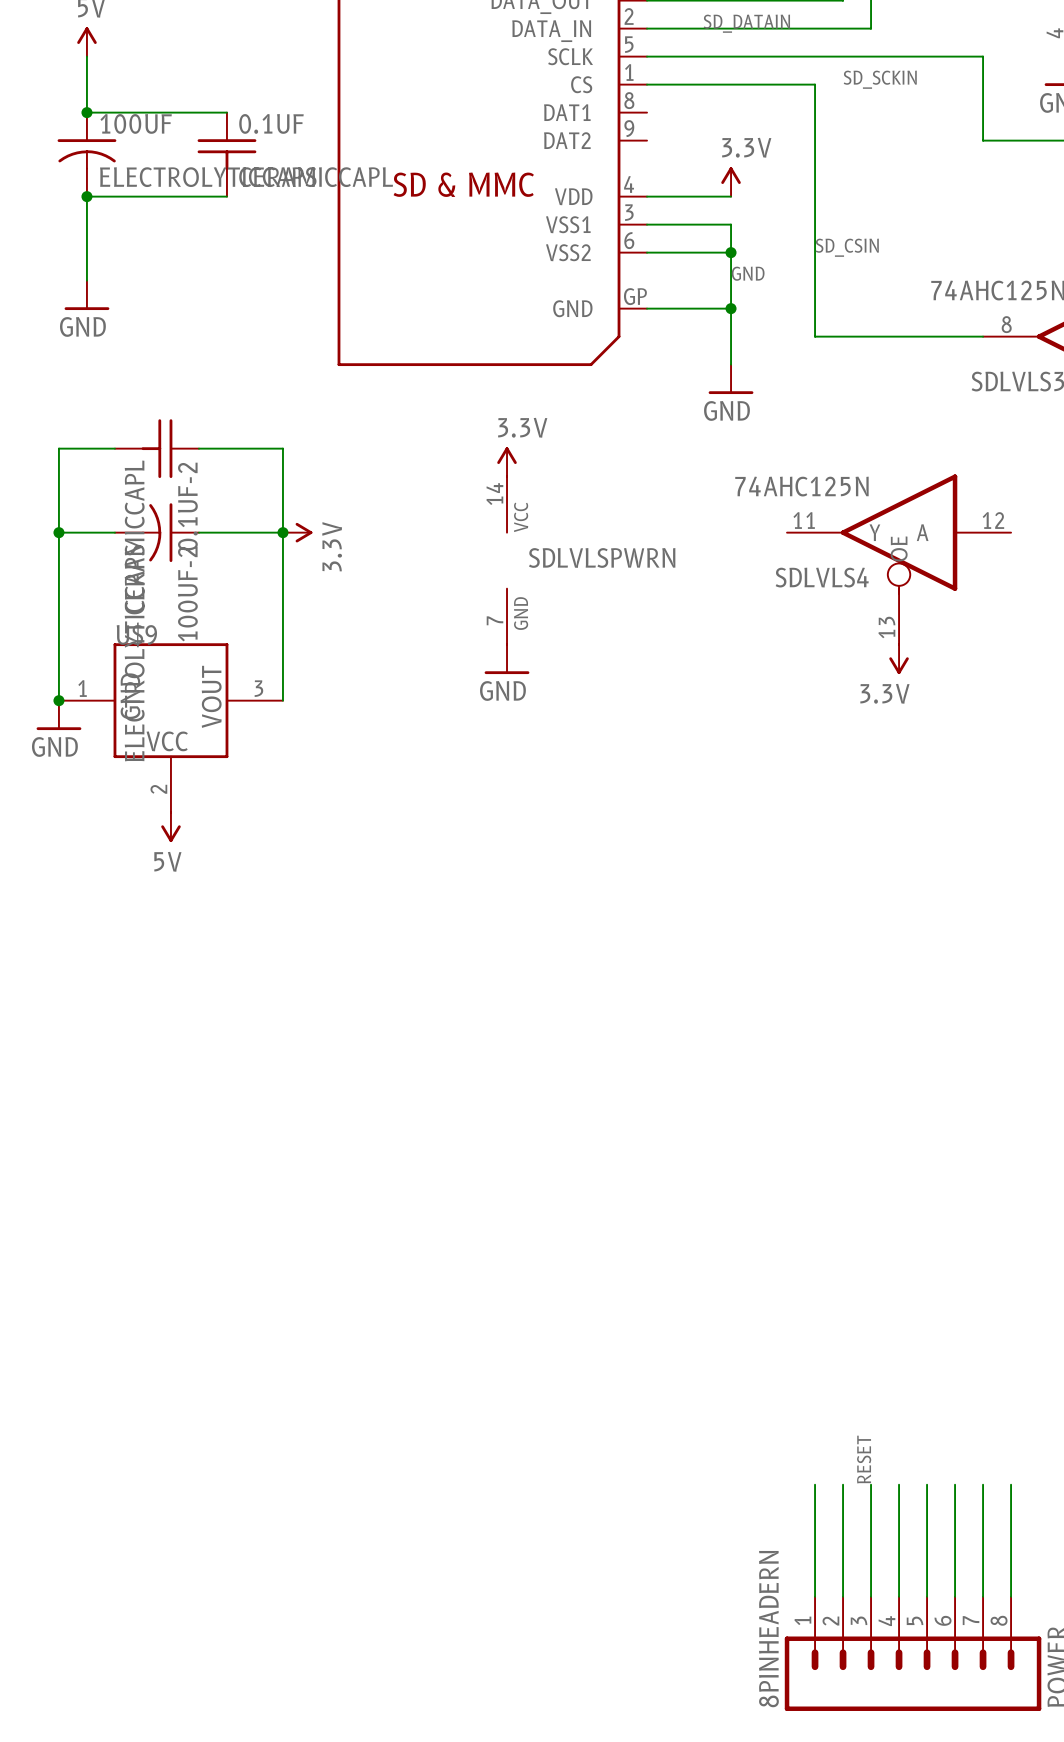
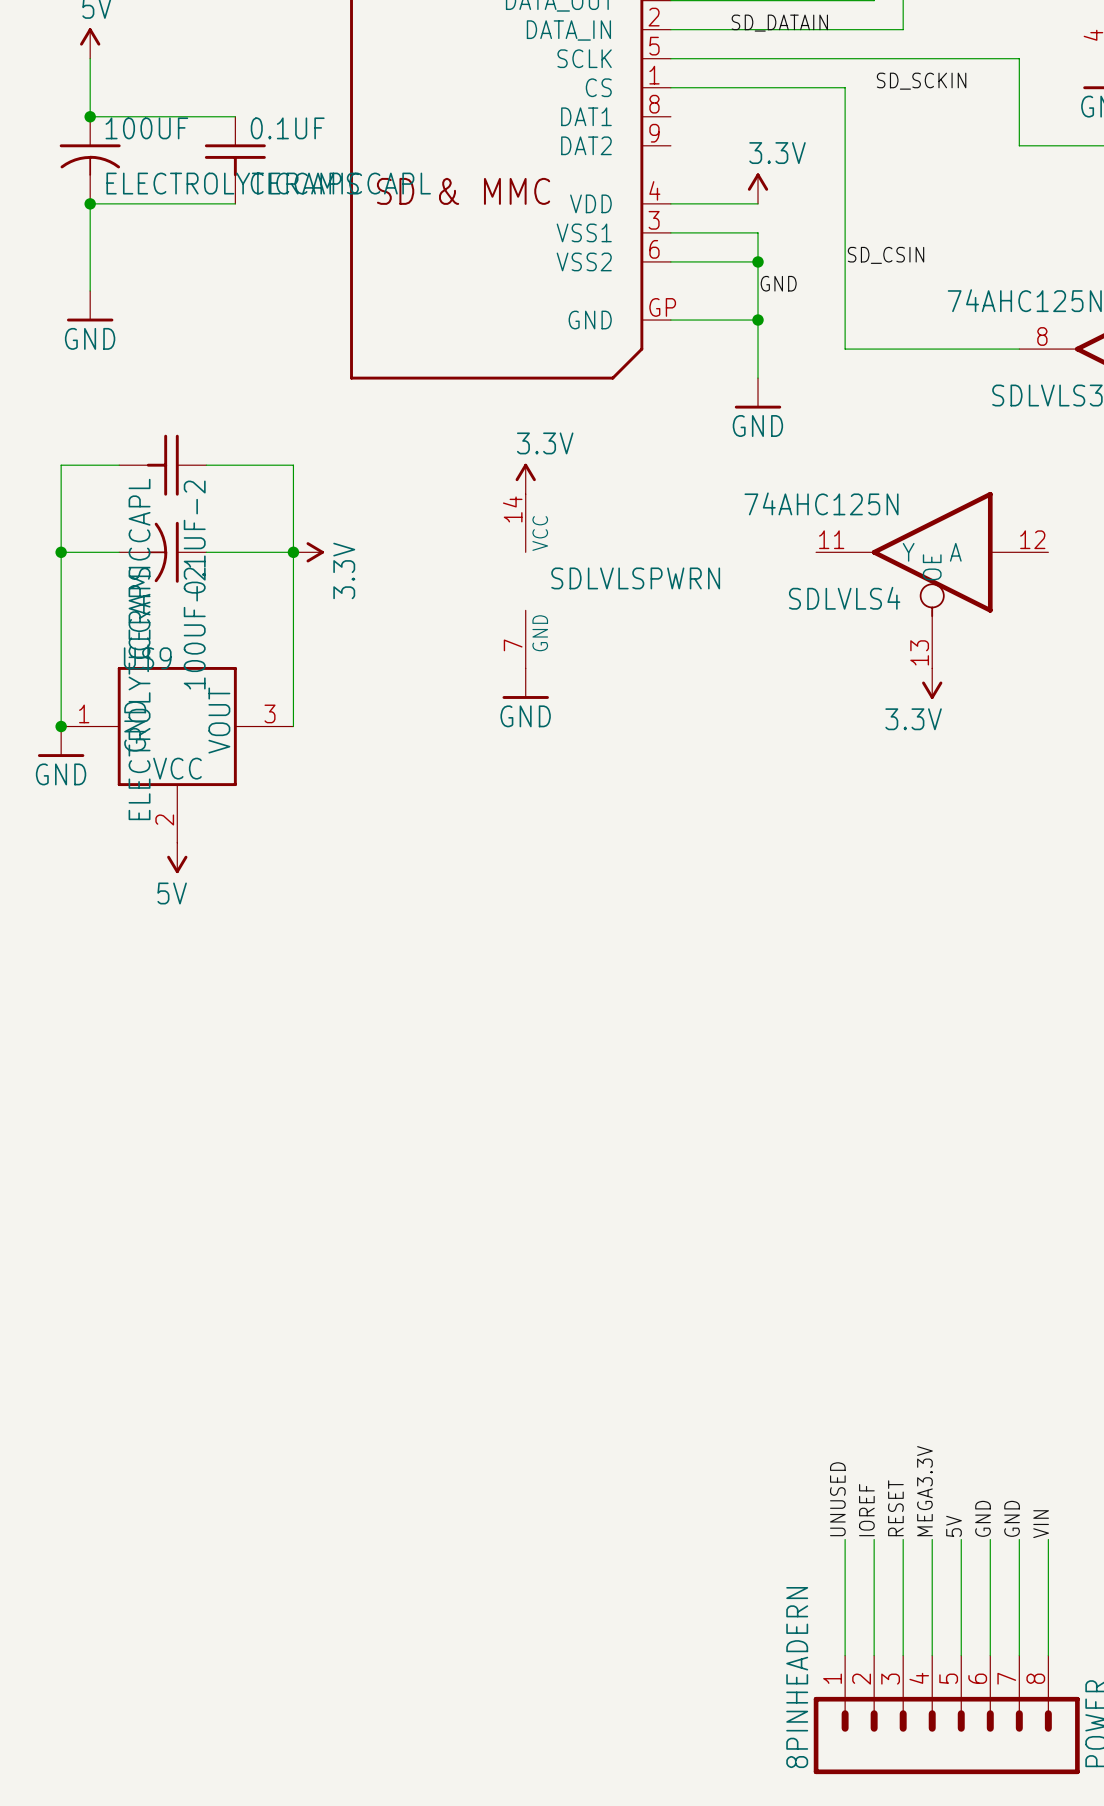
label: none -> MEGA3.3V (924, 1491)
label: none -> UNUSED (837, 1499)
label: none -> IOREF (866, 1510)
label: none -> GND (983, 1518)
label: none -> GND (1012, 1518)
label: none -> VIN (1041, 1524)
label: none -> 5V (953, 1526)

